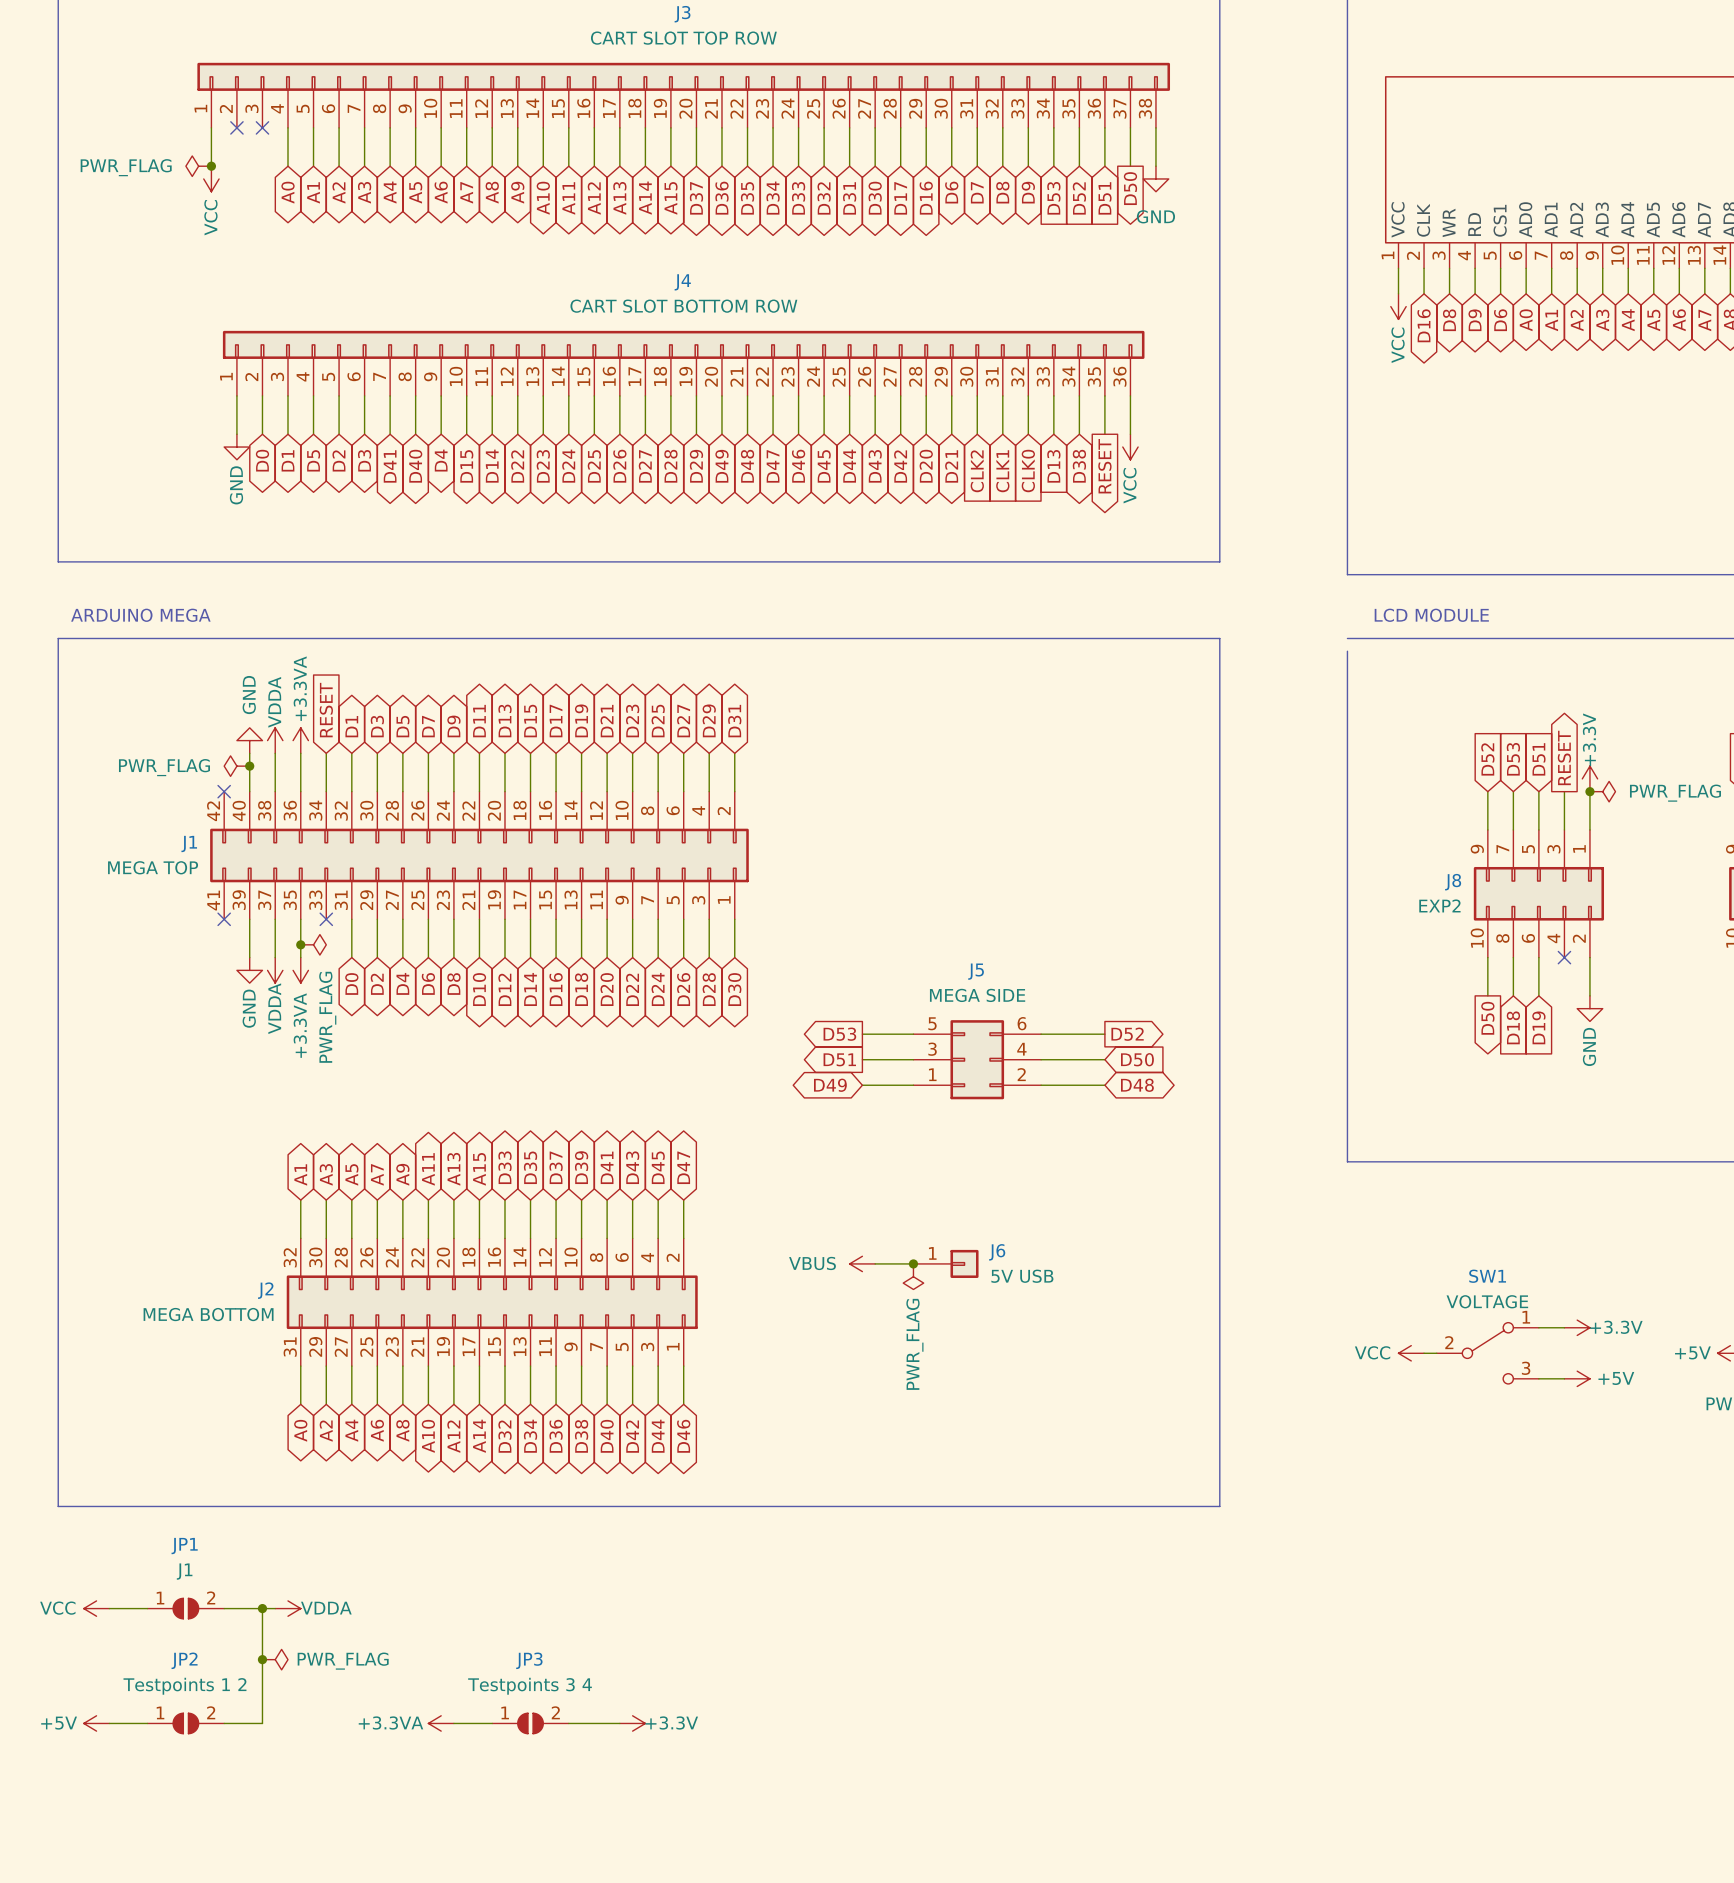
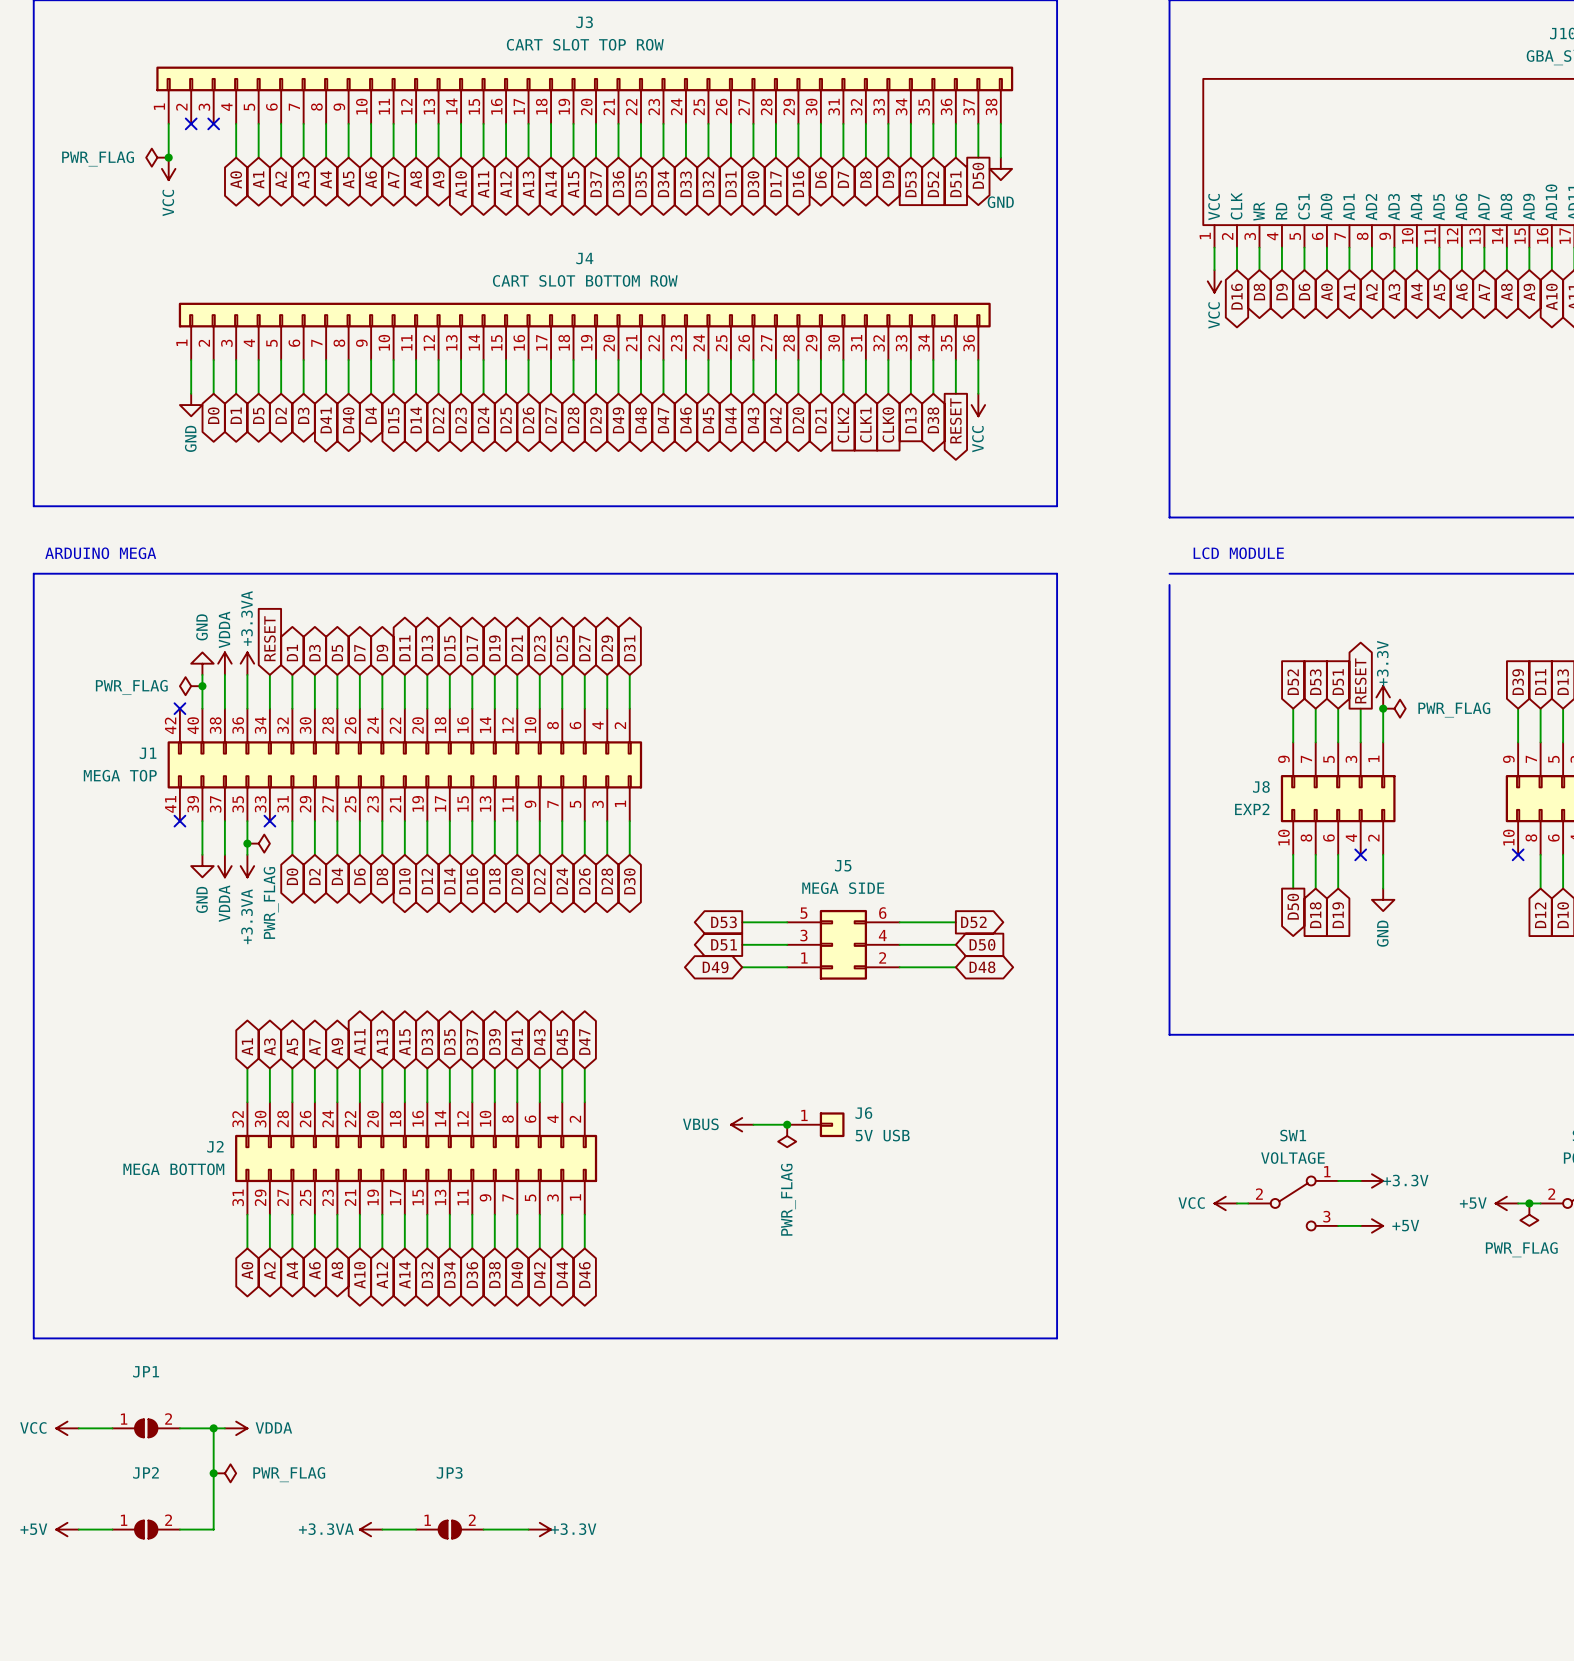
JP1 value: J1 (184, 1571) -> none
JP2 value: Testpoints 1 2 (184, 1686) -> none
JP3 value: Testpoints 3 4 (530, 1686) -> none

